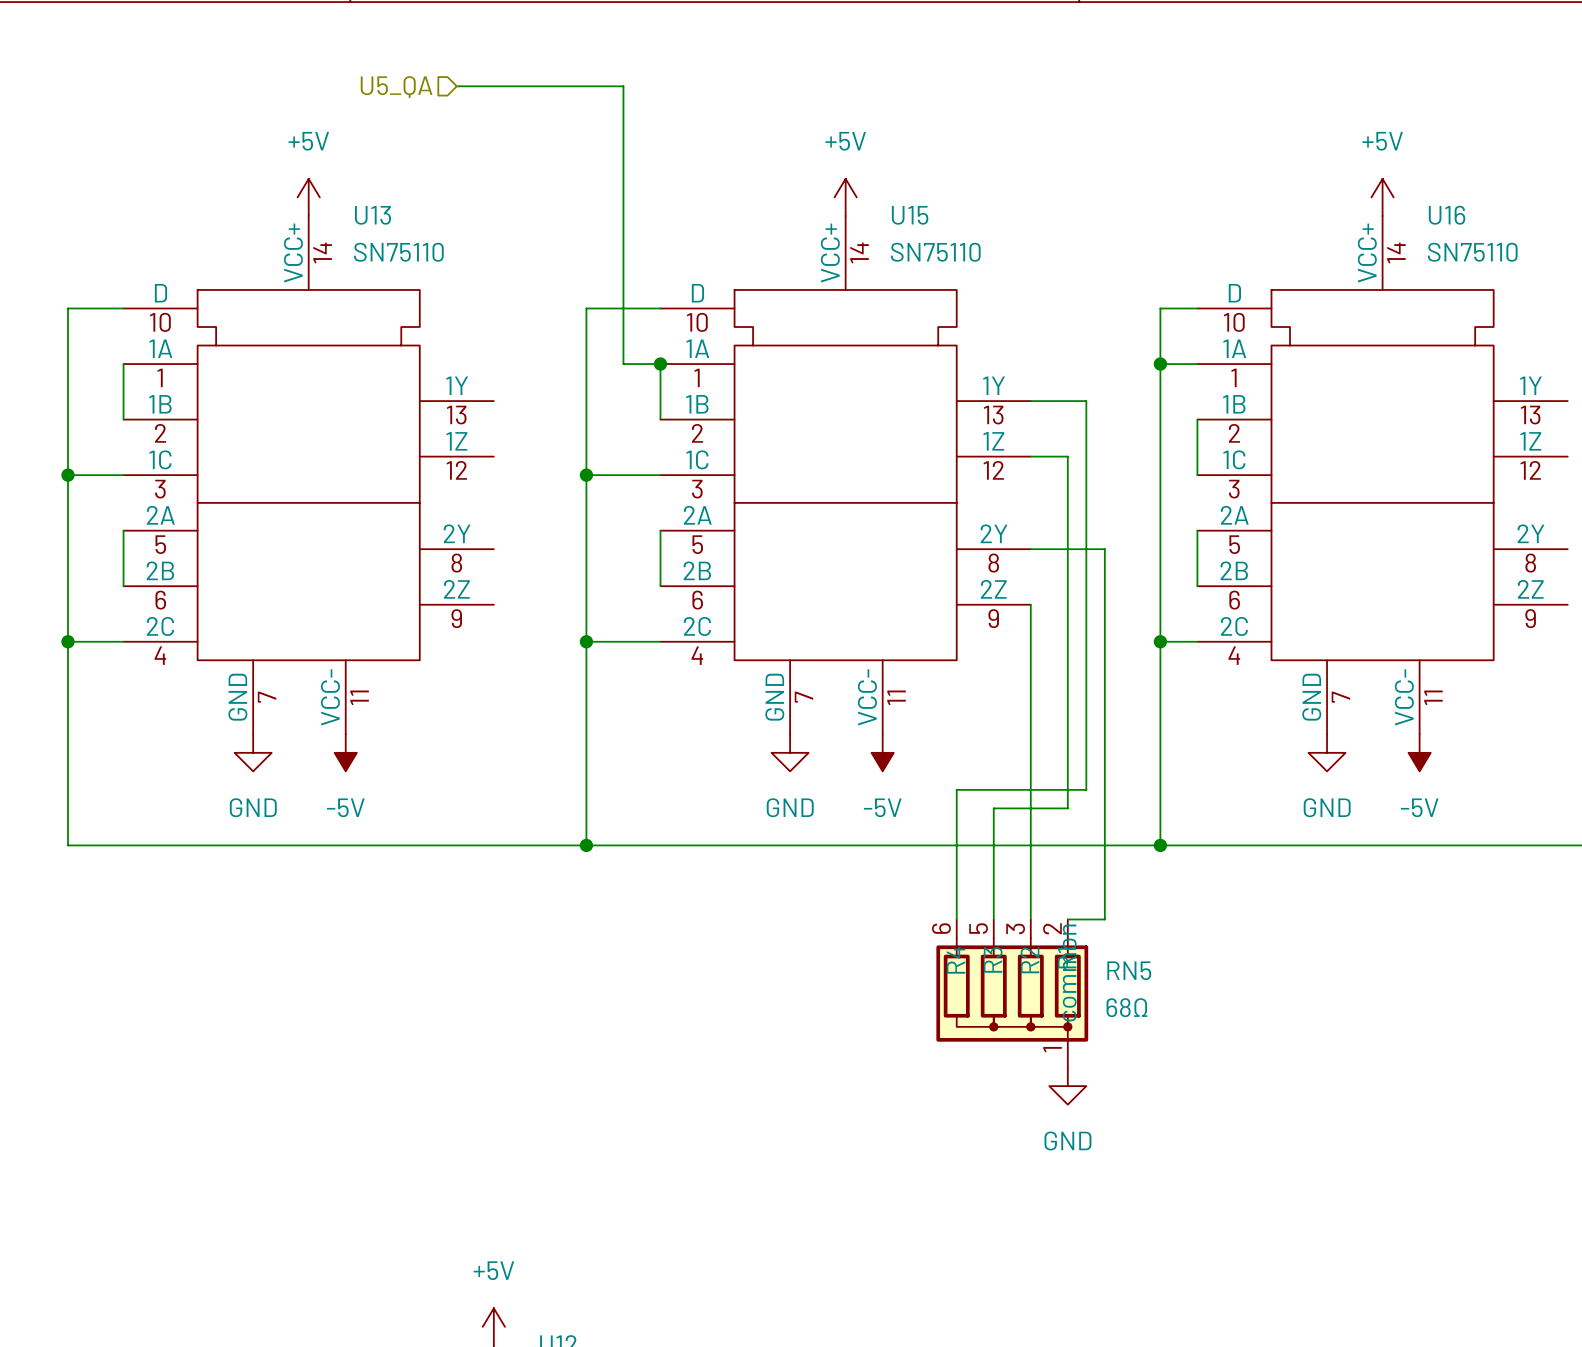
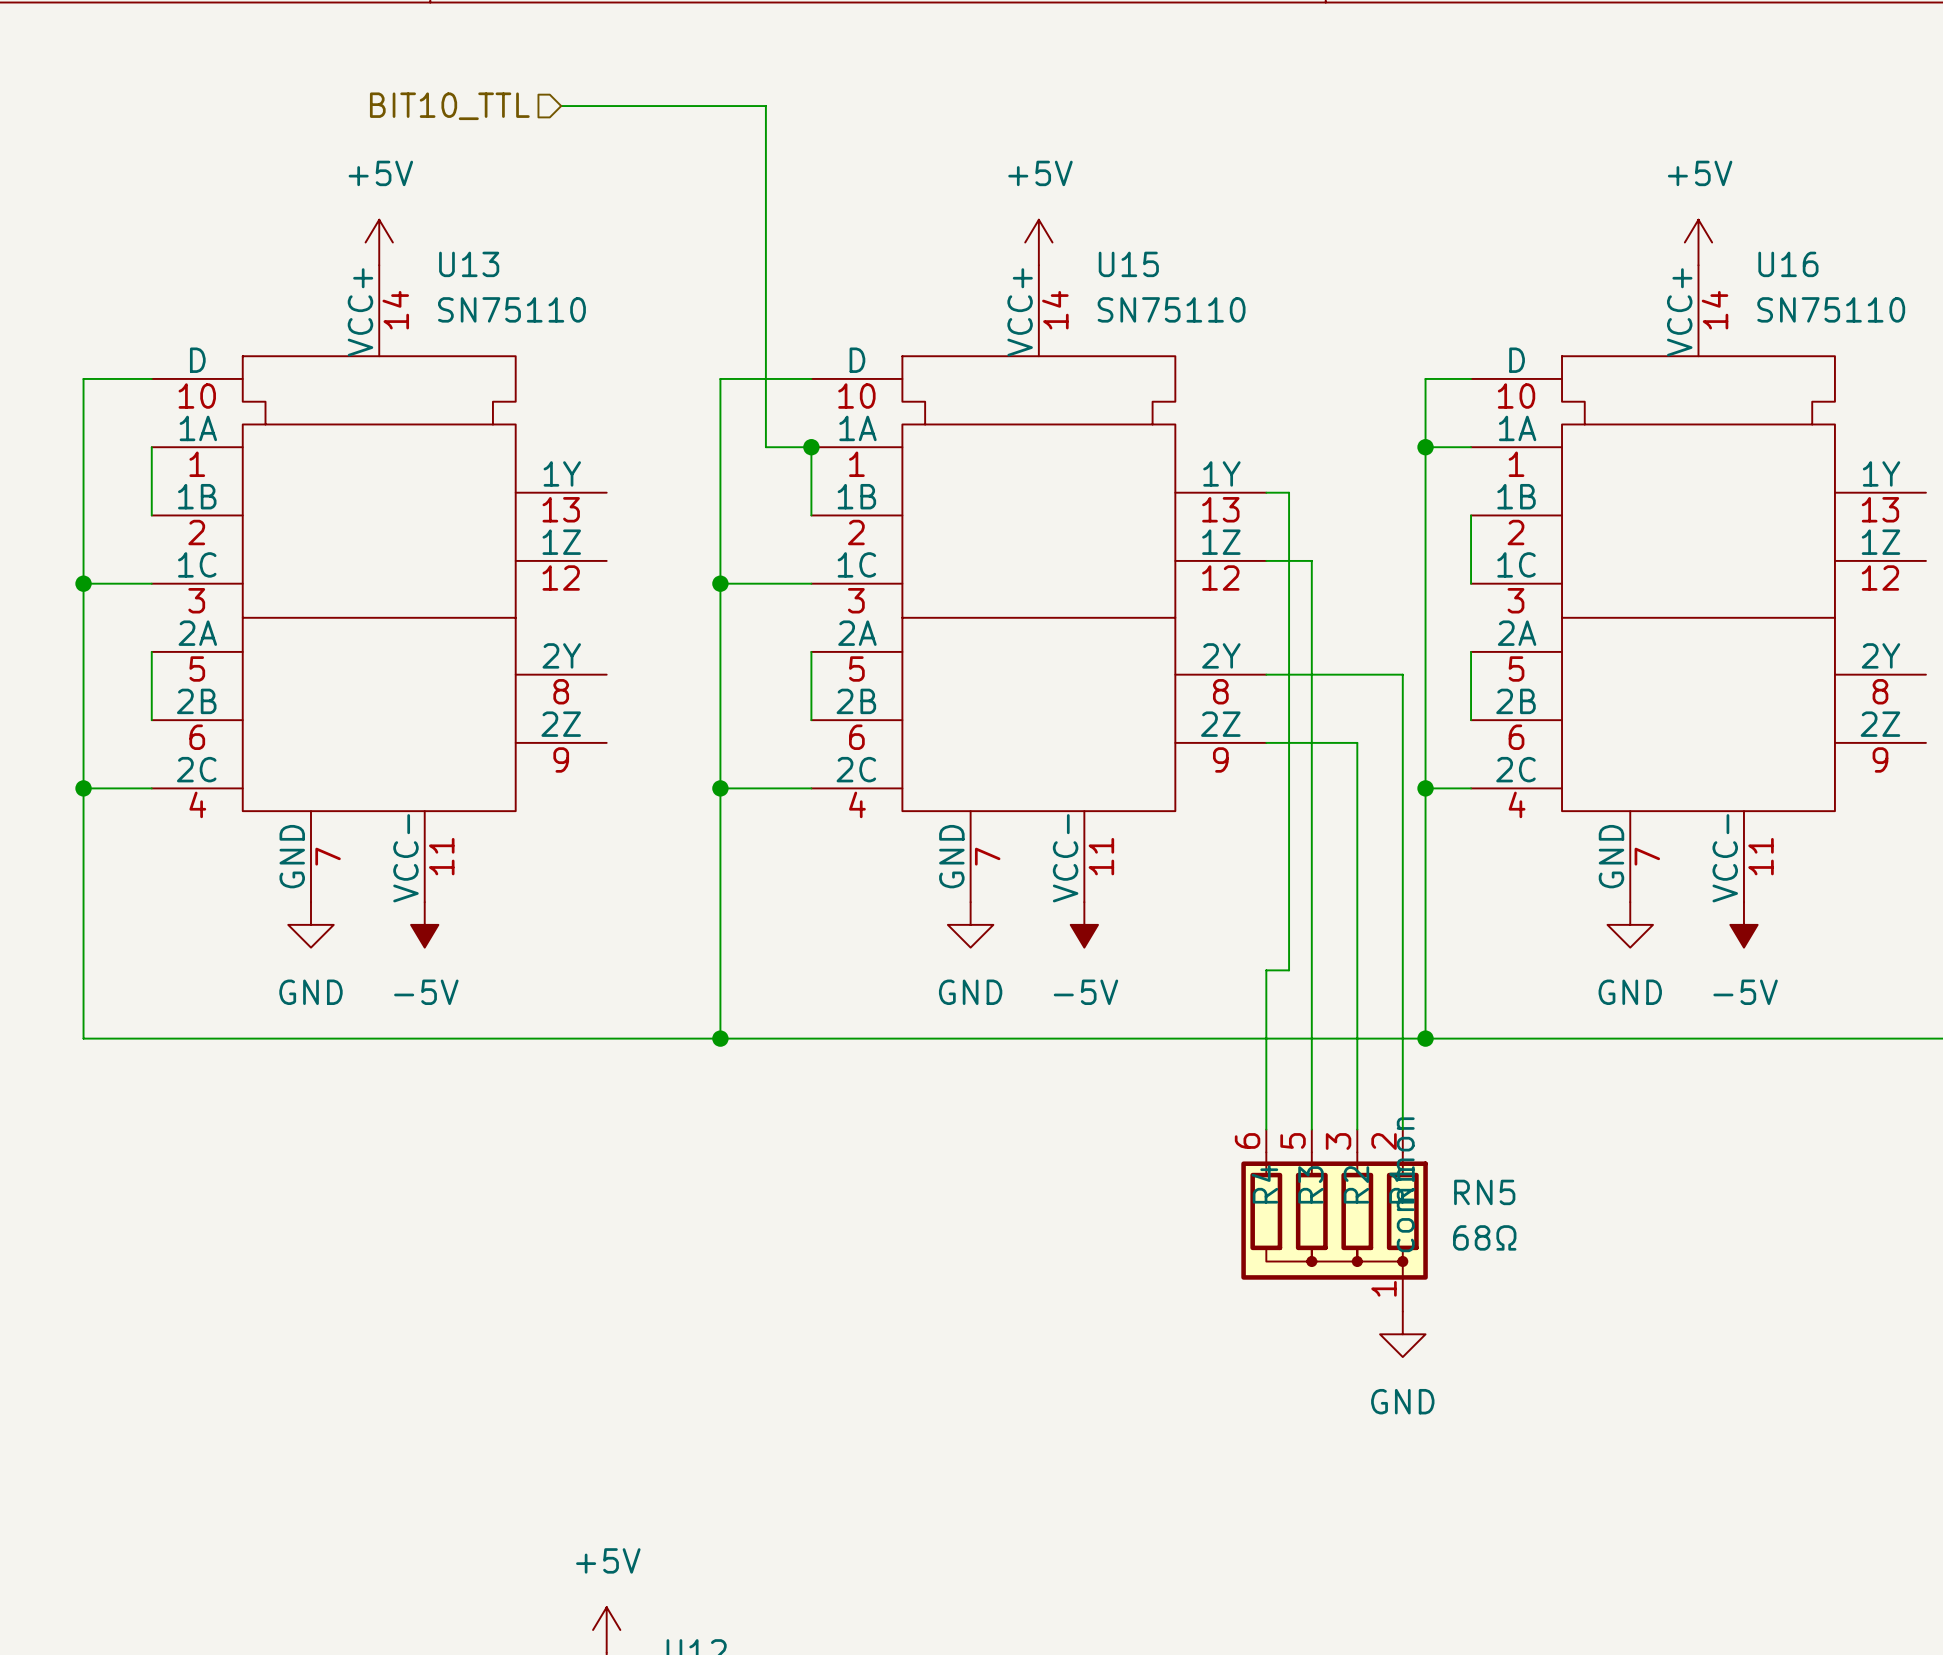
hierarchical label: U5_QA (396, 87) -> BIT10_TTL (449, 106)
wire: (1049, 401) (1086, 401) (1086, 789) (1049, 789) -> (1289, 492) (1289, 970)
wire: (1104, 549) (1104, 604) -> (1266, 742) (1357, 742)
wire: none -> (1357, 674) (1402, 674) (1402, 1129)
wire: (1030, 604) (1030, 789) (956, 789) (956, 919) -> none
wire: (1067, 808) (993, 808) (993, 919) -> (1311, 993) (1311, 1129)
wire: (1067, 919) (1104, 919) -> none
RN5 position: (1012, 993) -> (1334, 1220)
power symbol position: GND (1067, 1086) -> GND (1402, 1334)

